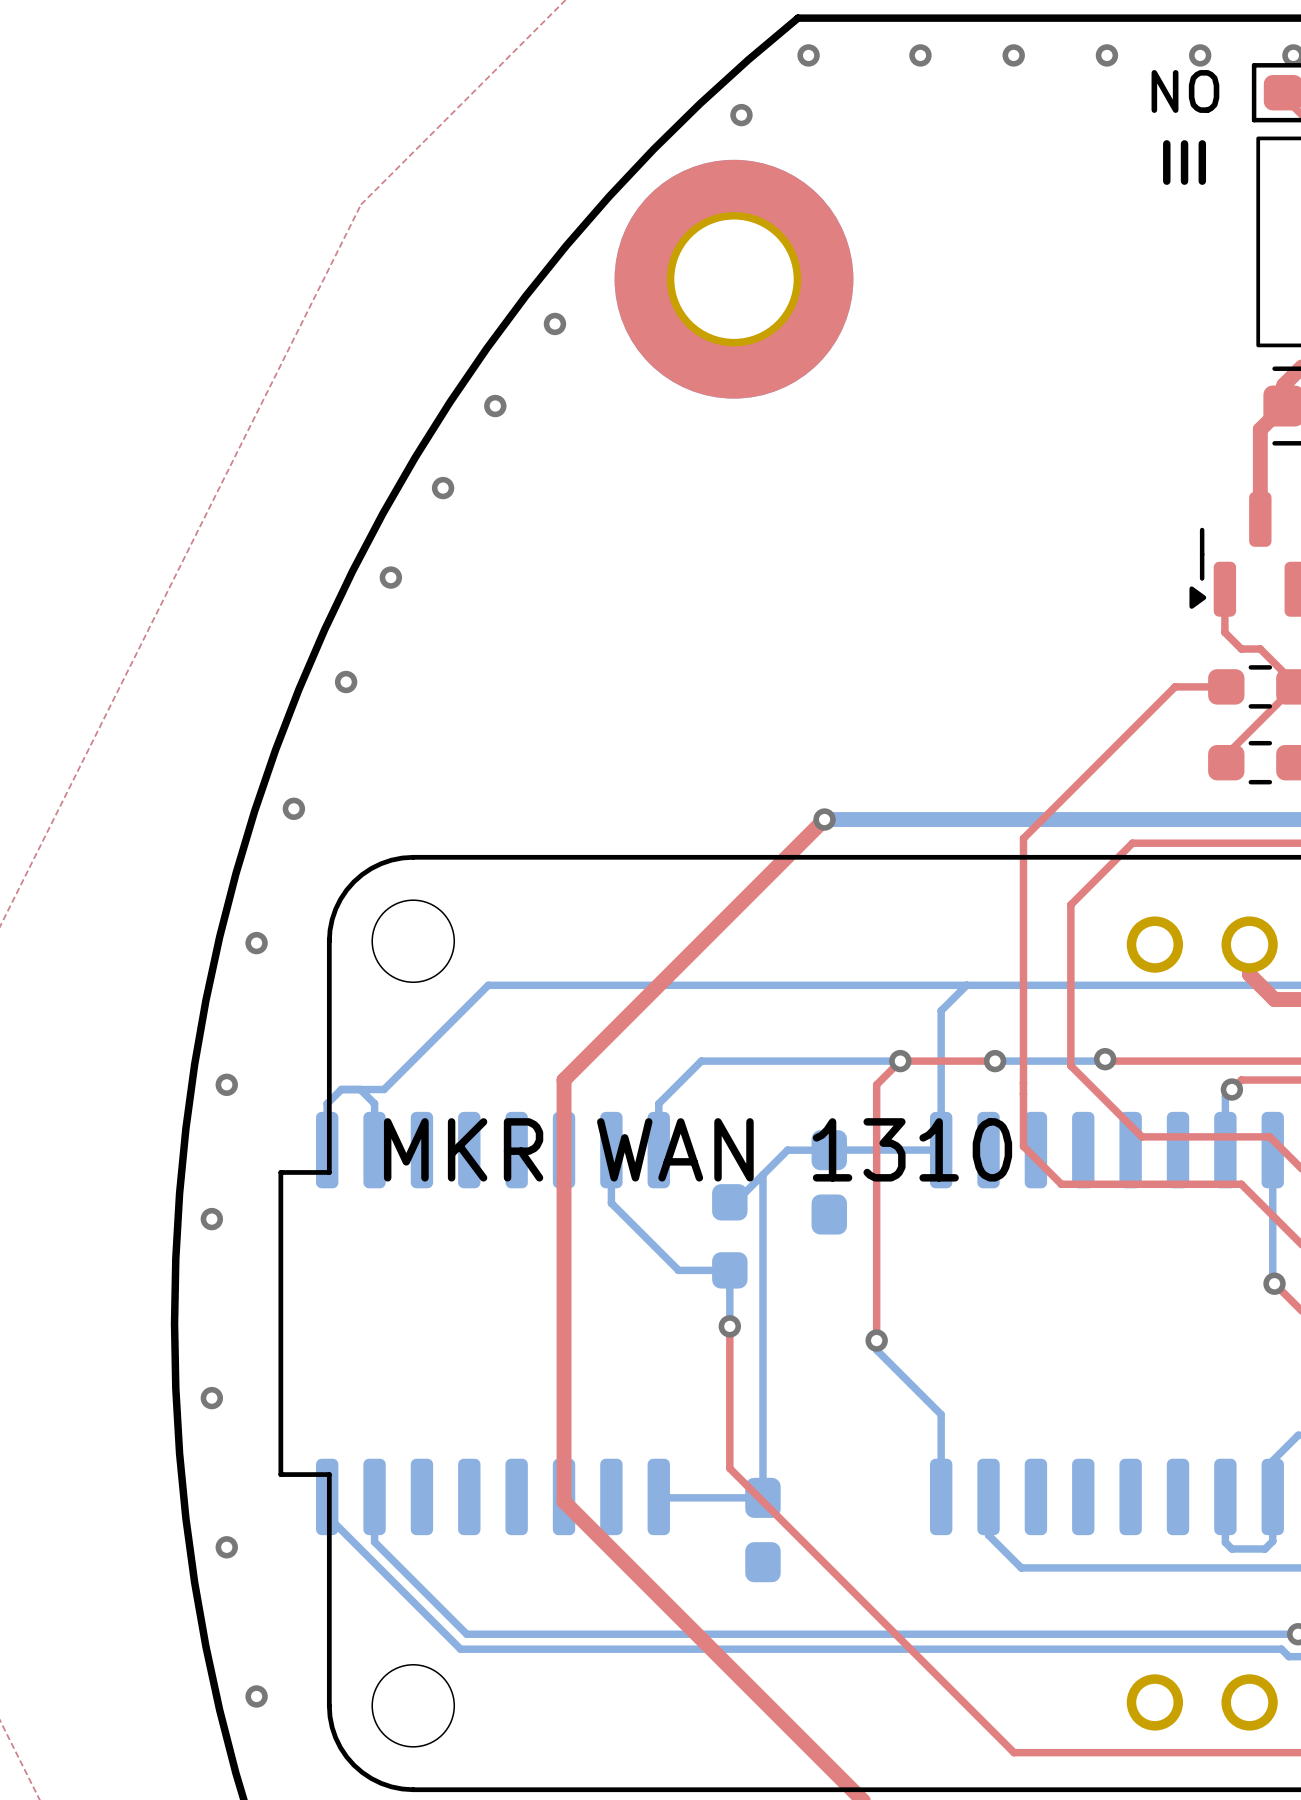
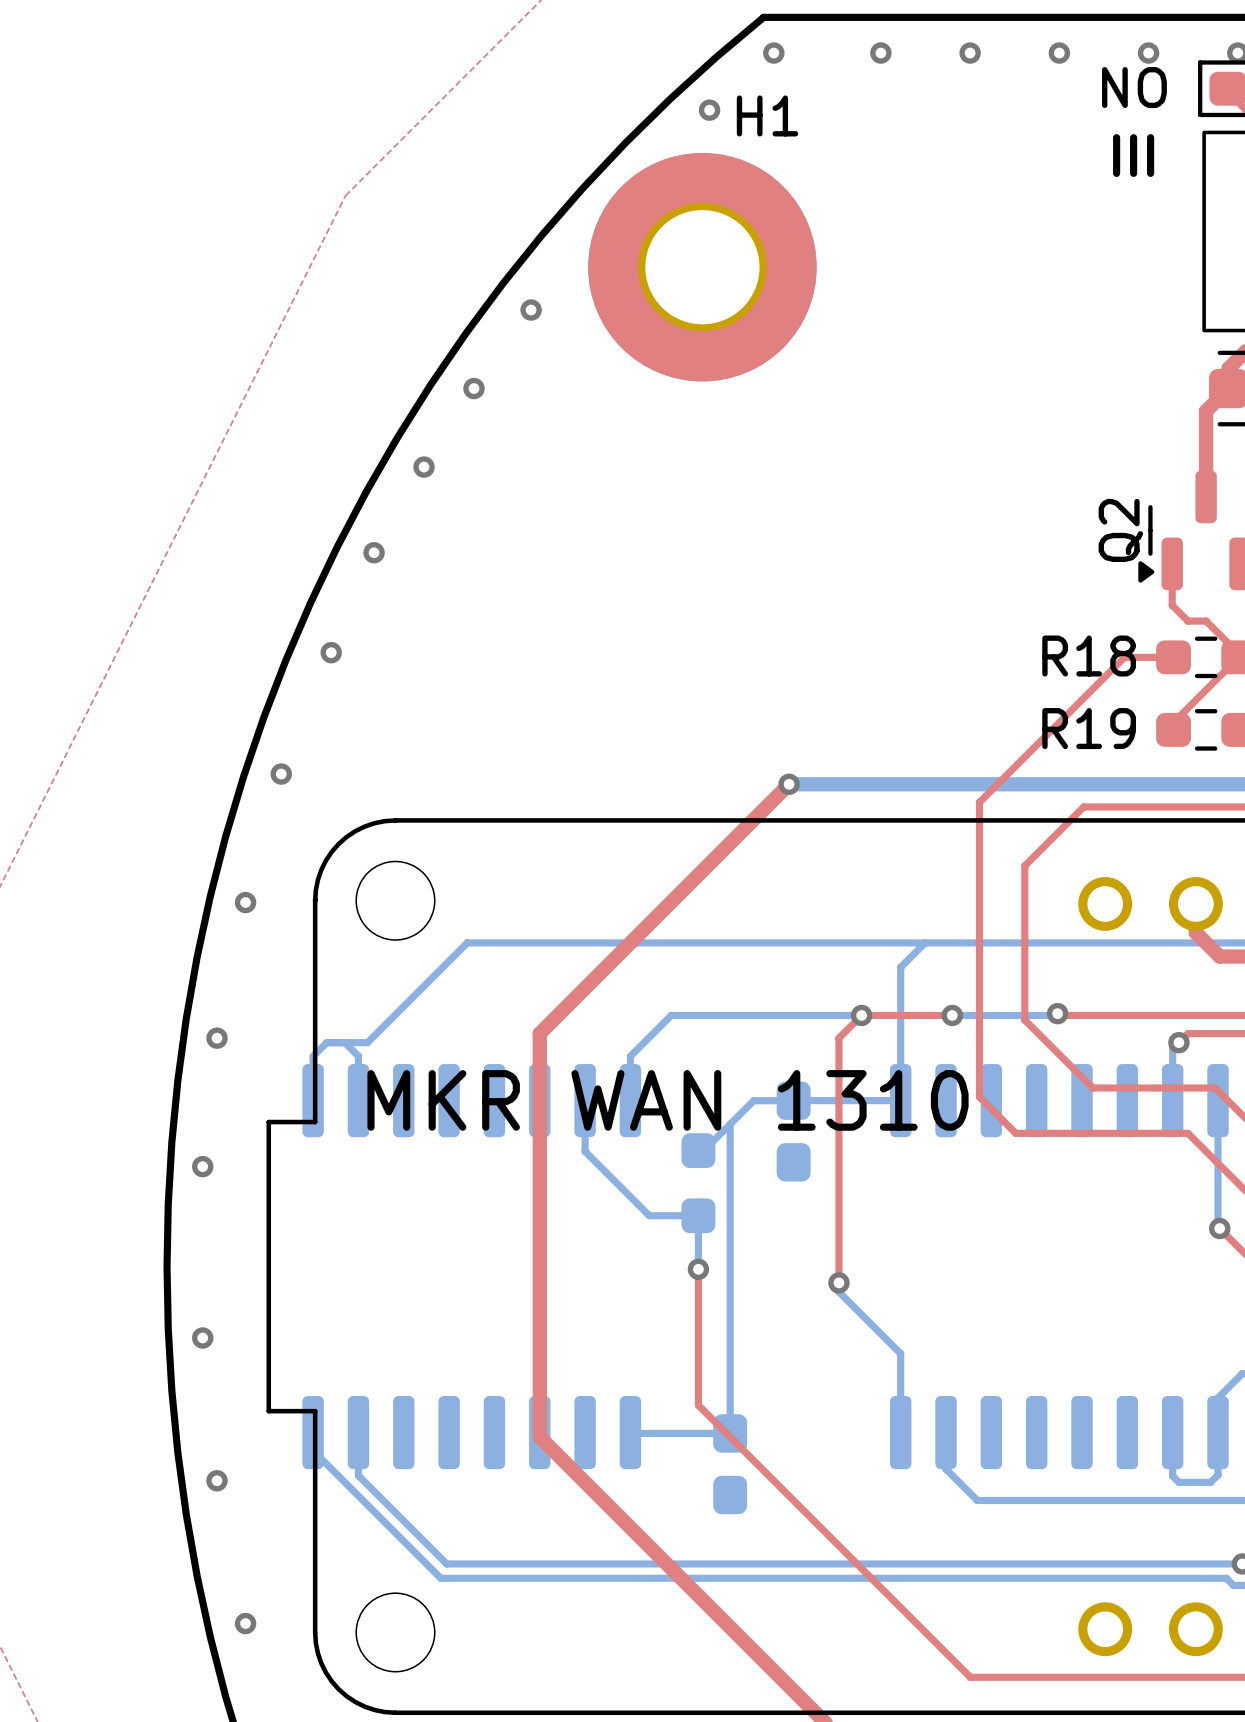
H1 name: none -> H1 (767, 115)
Q2 name: none -> Q2 (1120, 530)
R18 name: none -> R18 (1089, 656)
R19 name: none -> R19 (1089, 728)

